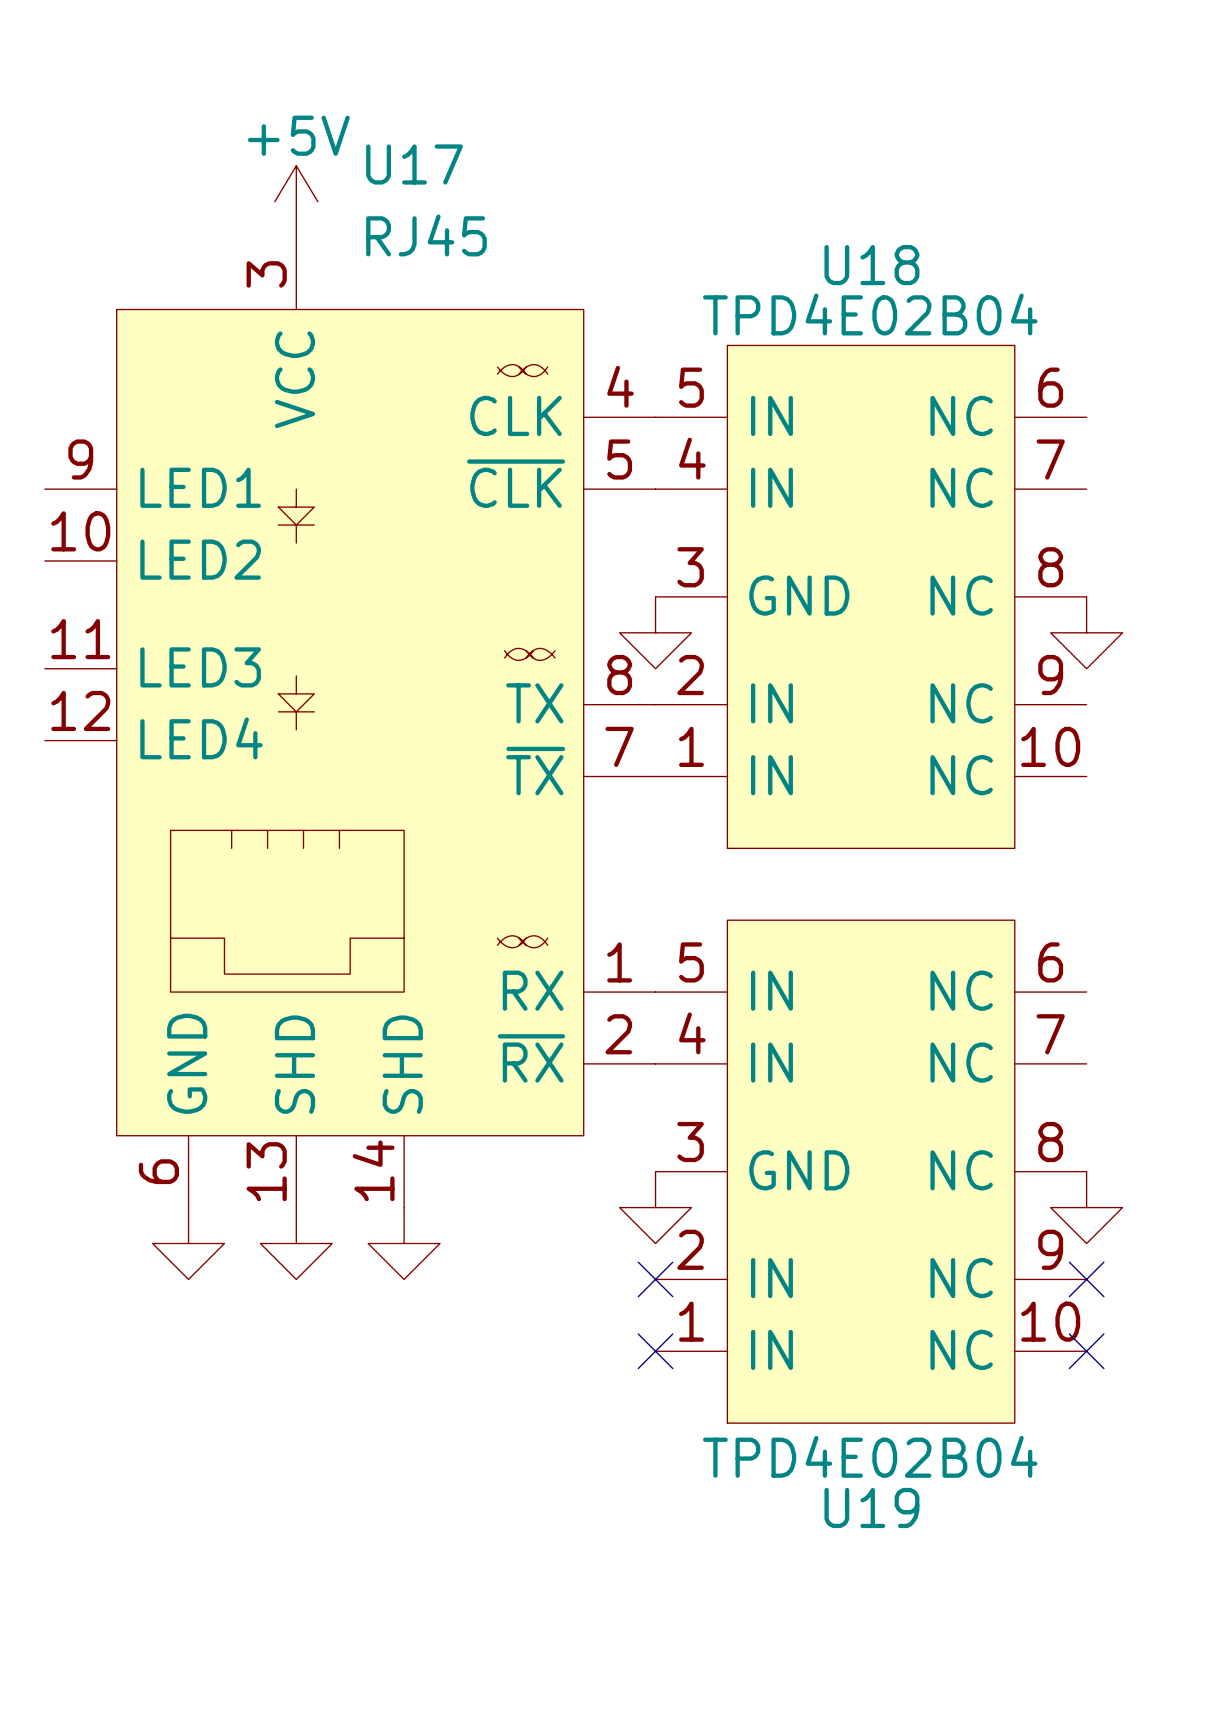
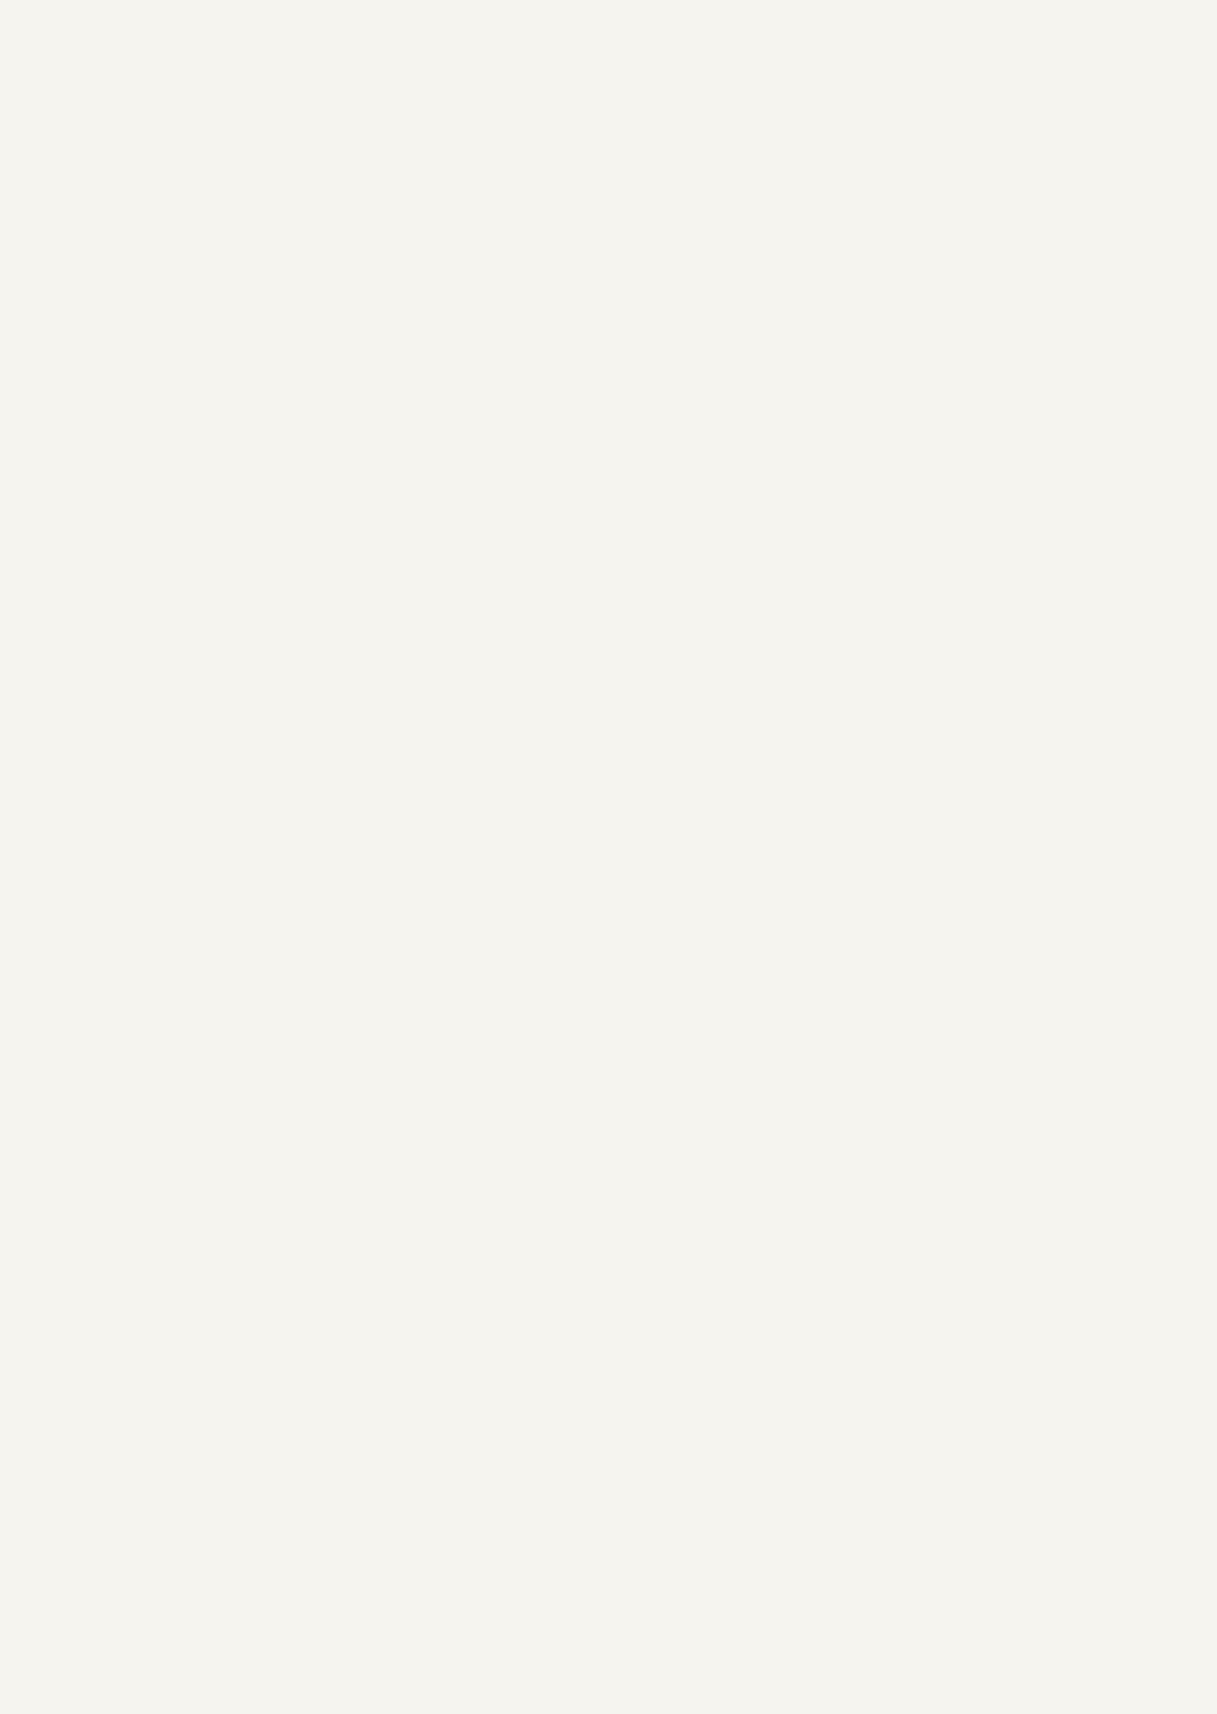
power symbol: +5V (296, 201) -> none
U18: TPD4E02B04 (871, 596) -> none
power symbol: (655, 632) -> none
power symbol: (1086, 632) -> none
U17: RJ45 (350, 722) -> none
U19: TPD4E02B04 (871, 1171) -> none
power symbol: (655, 1207) -> none
power symbol: (1086, 1207) -> none
power symbol: (188, 1243) -> none
power symbol: (296, 1243) -> none
power symbol: (404, 1243) -> none
no-connect mark: (655, 1279) -> none
no-connect mark: (1086, 1279) -> none
no-connect mark: (655, 1351) -> none
no-connect mark: (1086, 1351) -> none

